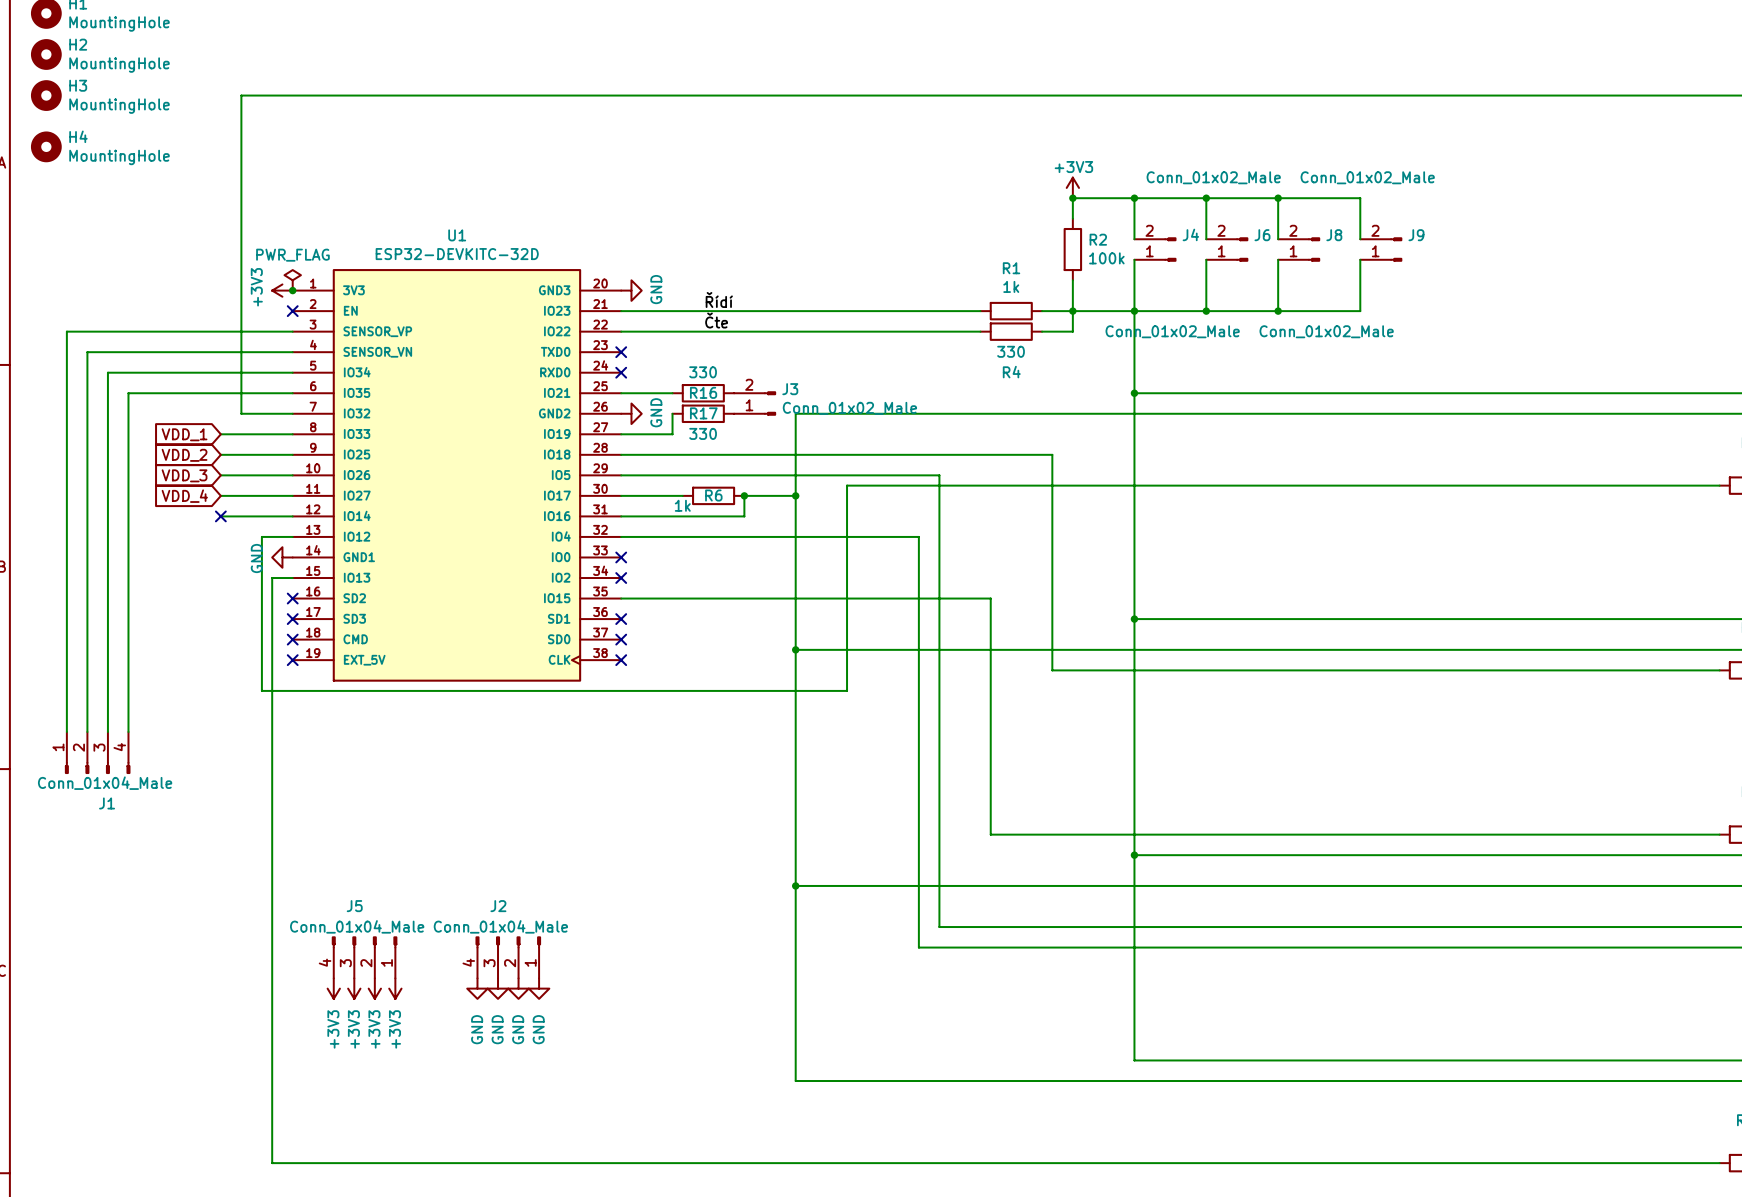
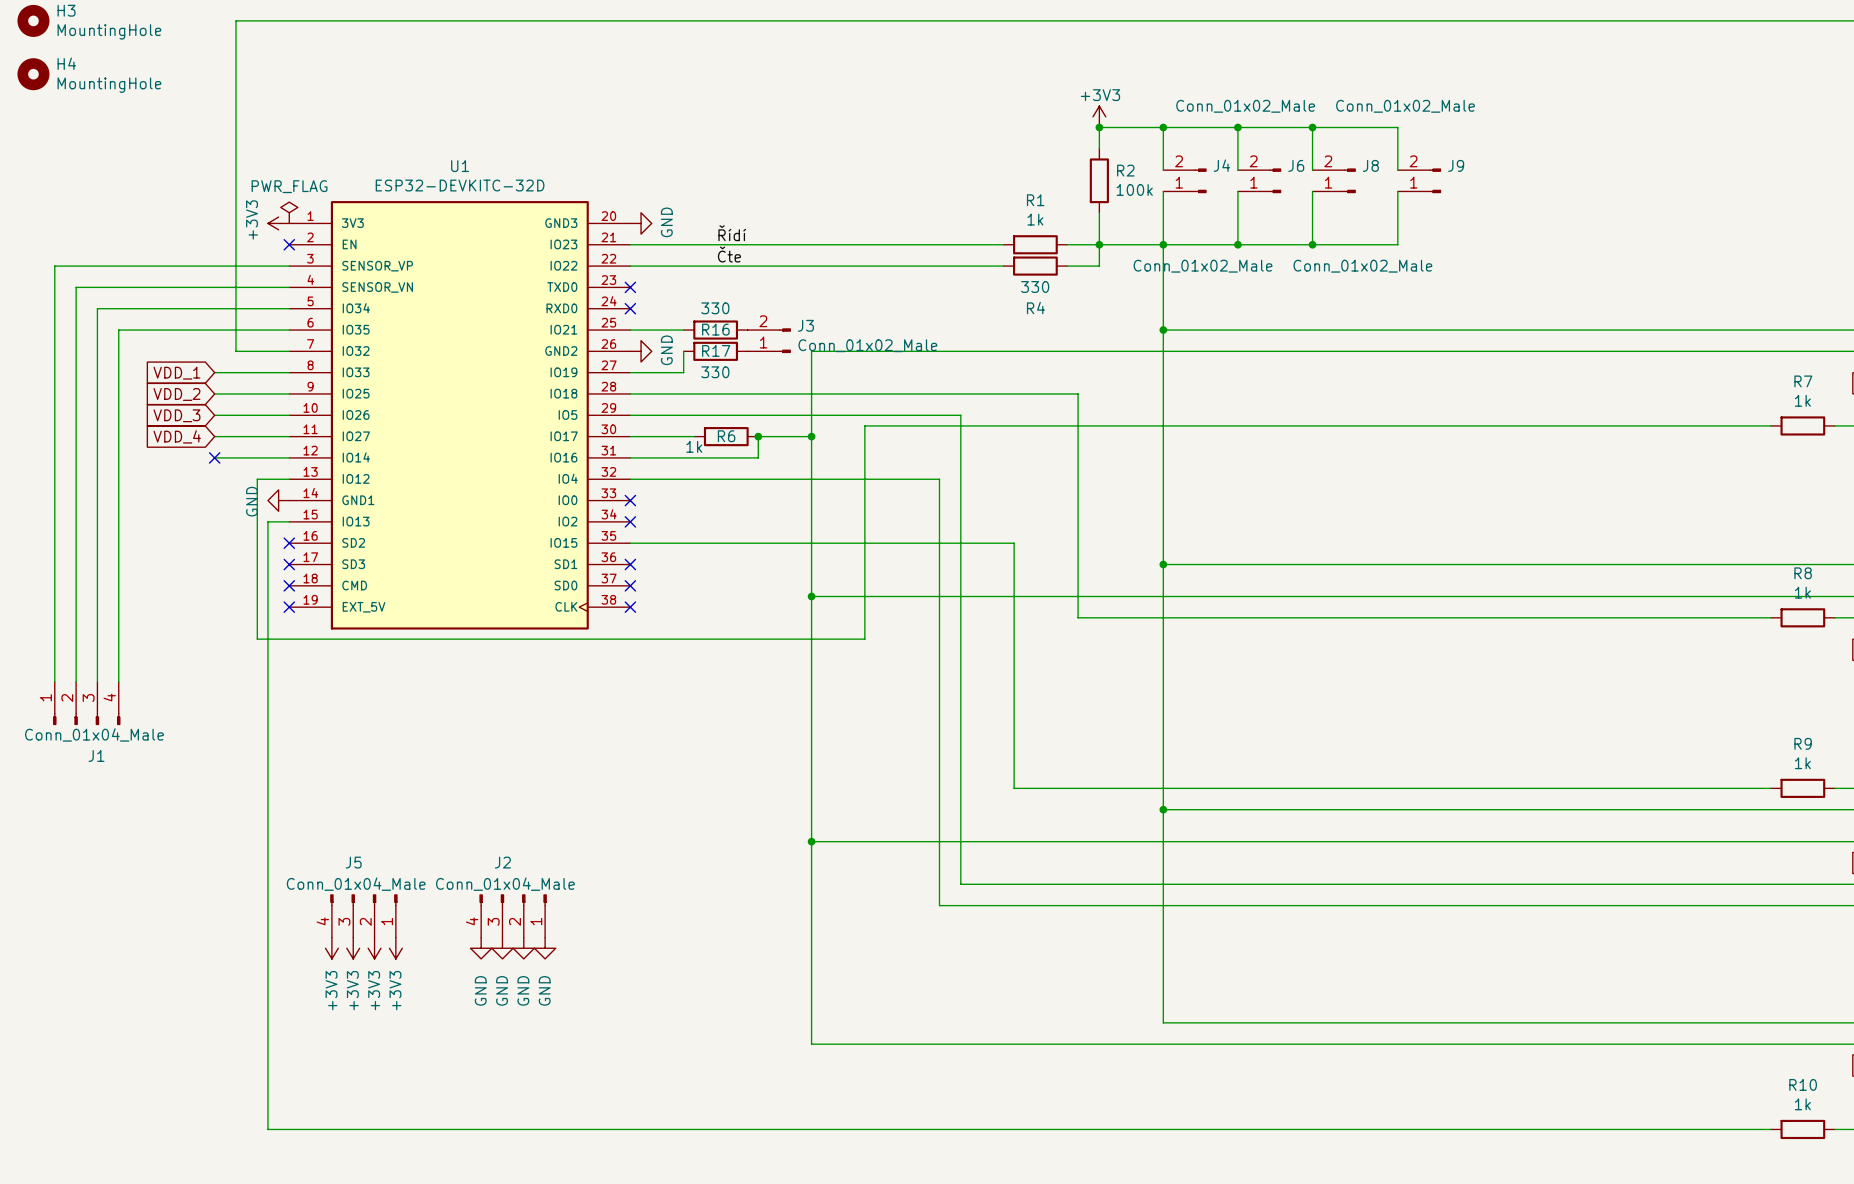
junction: (292, 290) -> none

